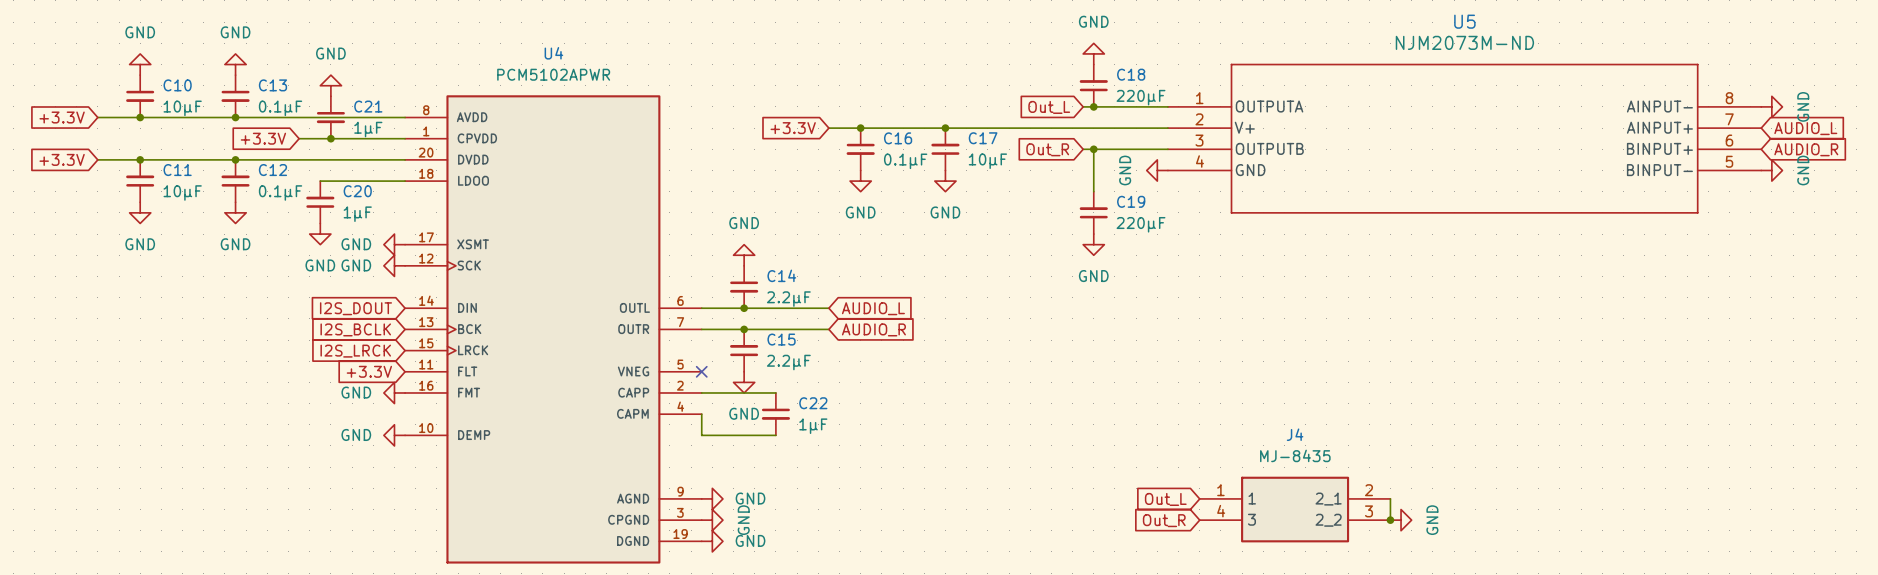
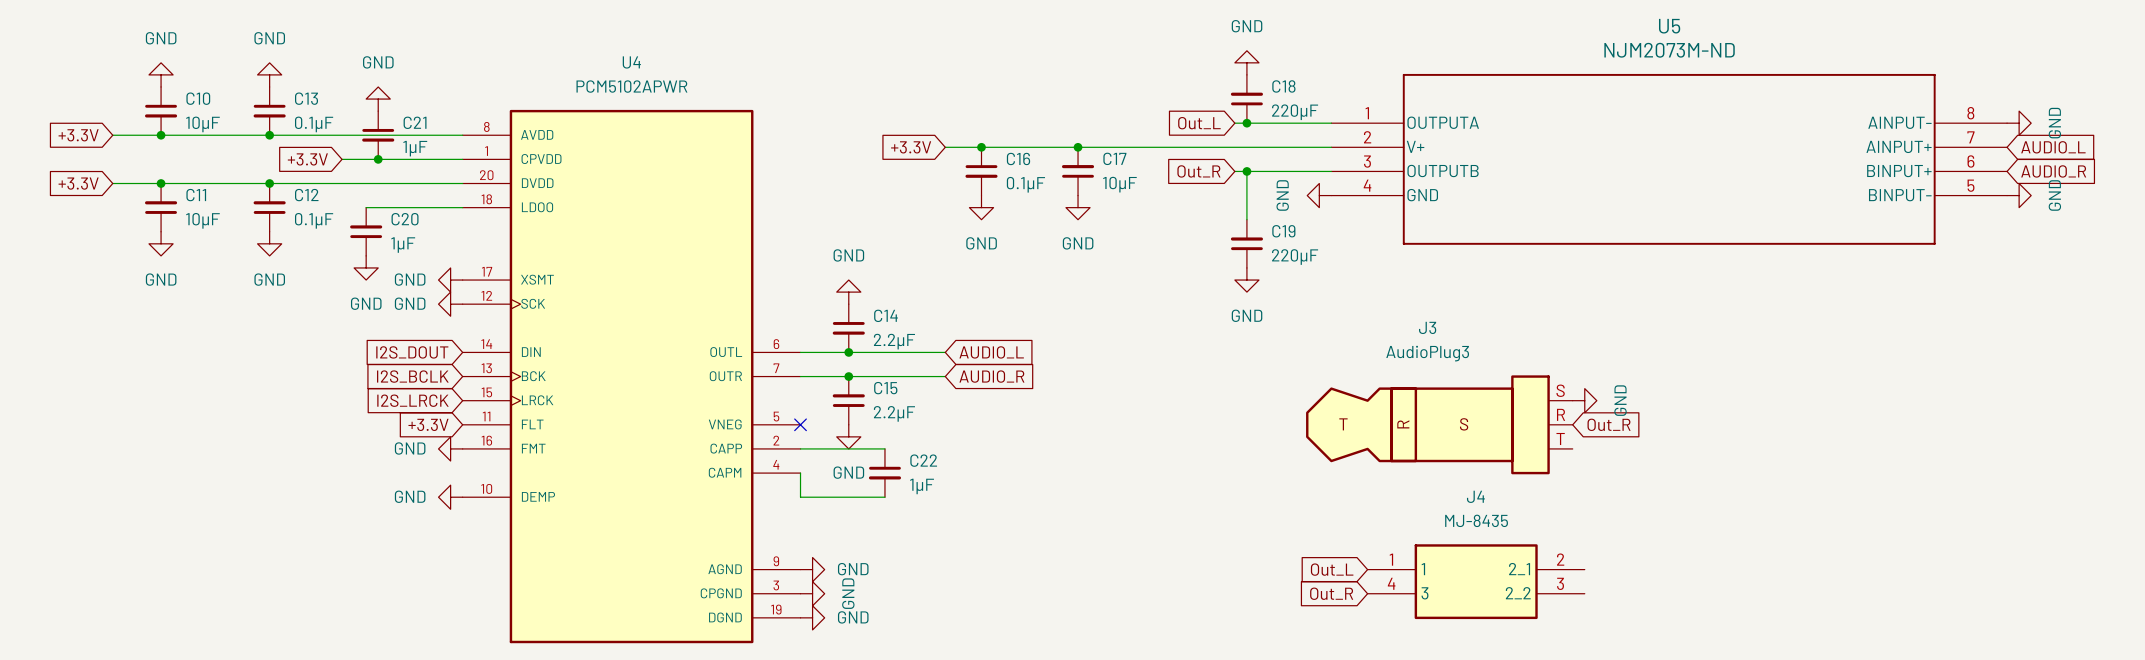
J3: none -> AudioPlug3 (1439, 424)
global label: none -> Out_R (1609, 424)
wire: (1390, 498) (1390, 520) -> none
junction: (1390, 520) -> none
power symbol position: GND (1401, 520) -> GND (1584, 400)

